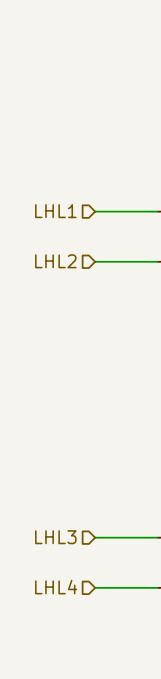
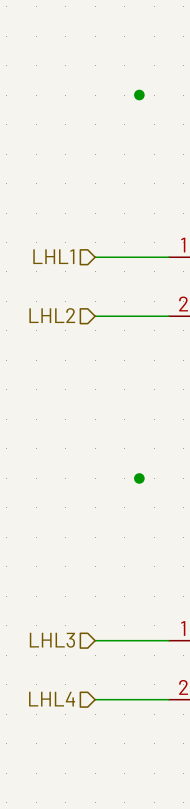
junction: none -> (139, 95)
junction: none -> (139, 478)

